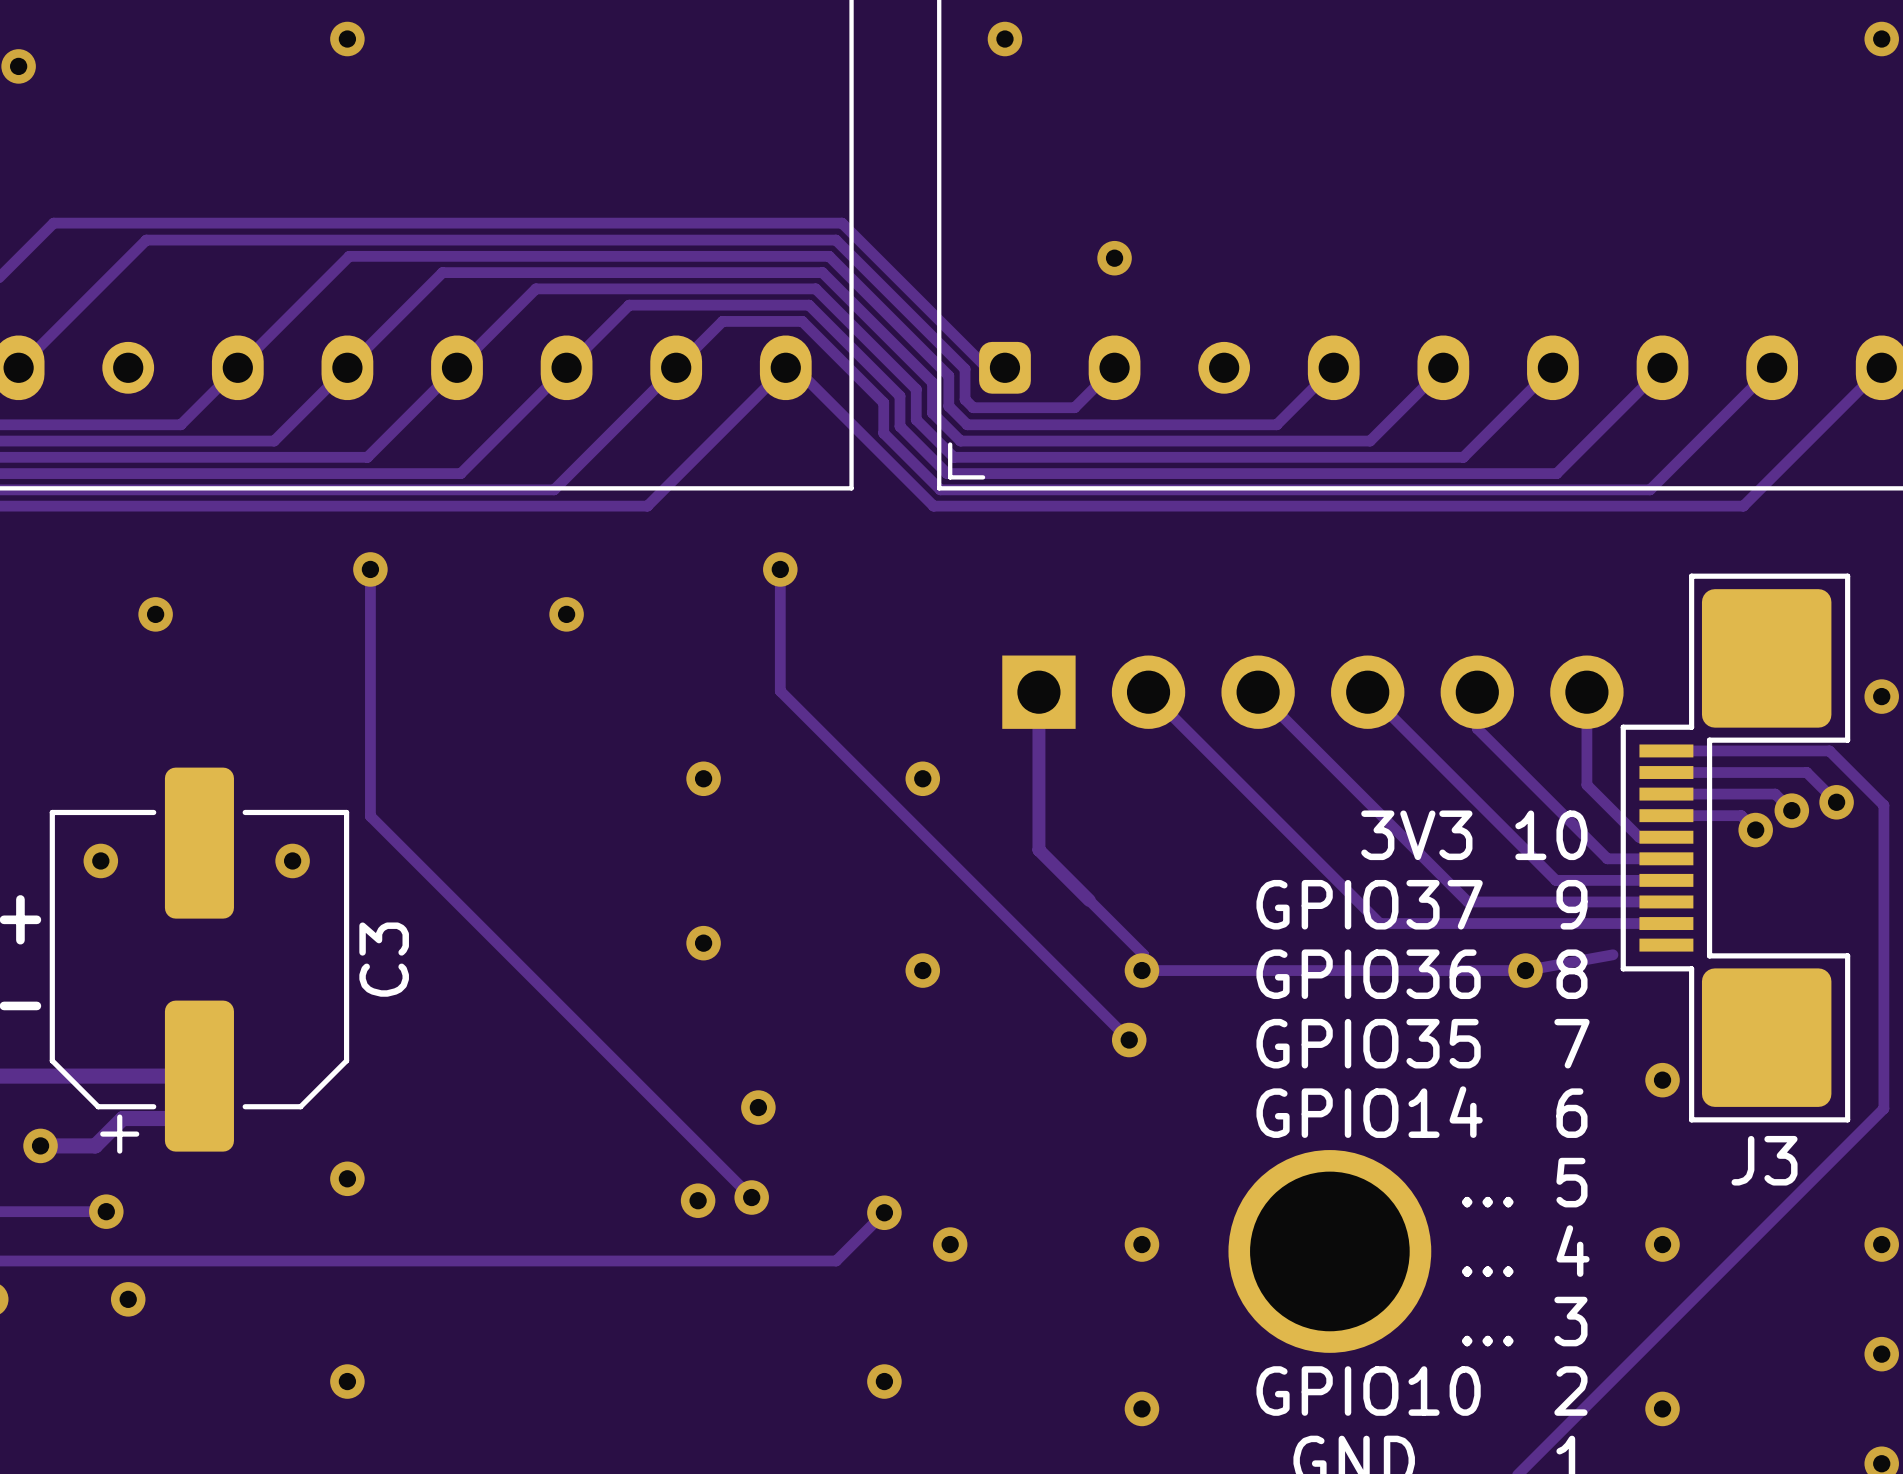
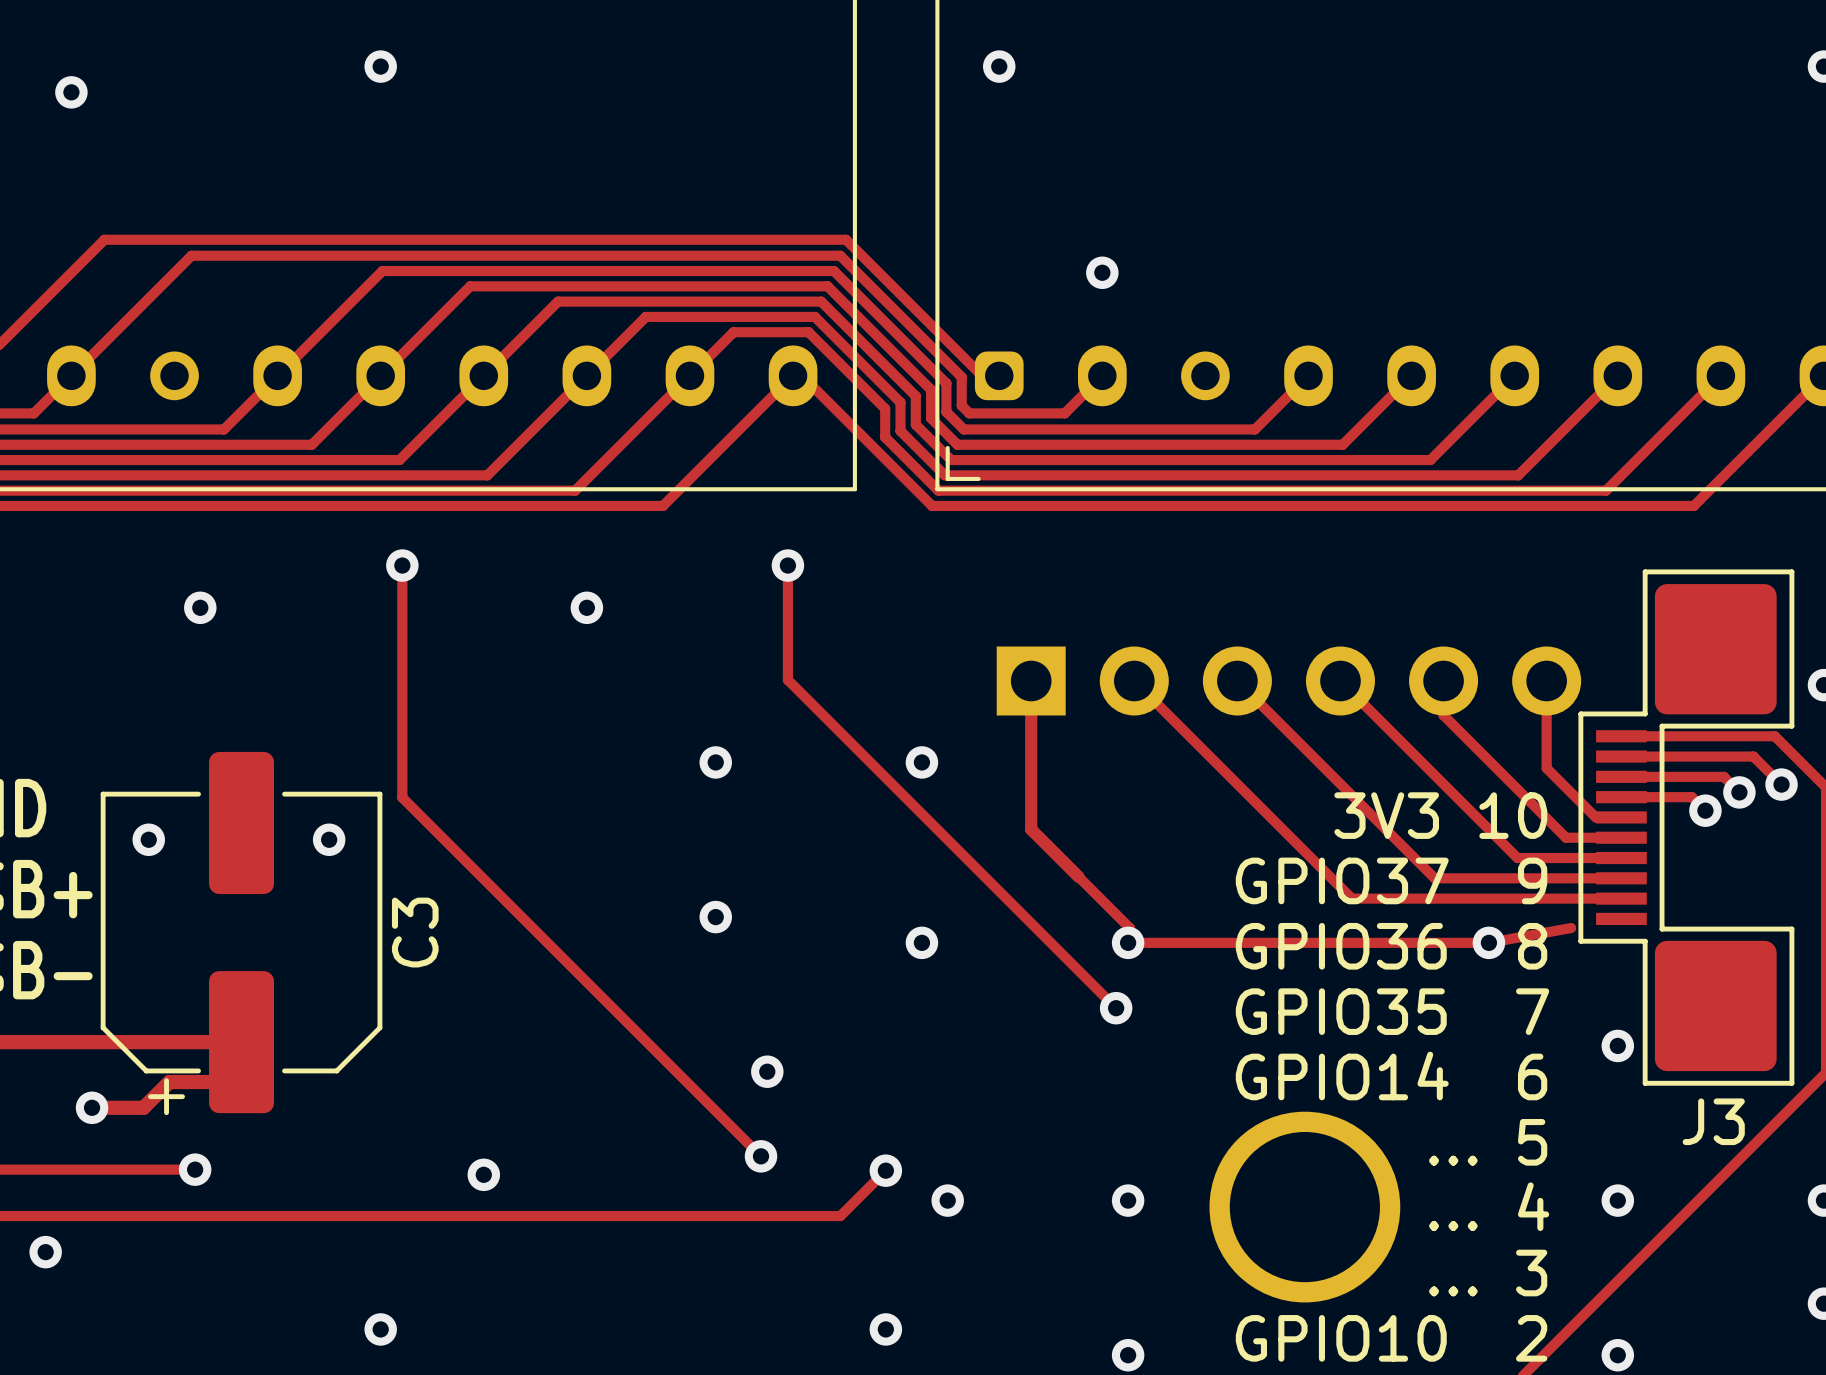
via: (347, 1178) -> none
via: (698, 1200) -> none
track: none -> (153, 1169) (195, 1169)
via position: (106, 1211) -> (195, 1169)
via: none -> (483, 1174)
via: (128, 1299) -> none

